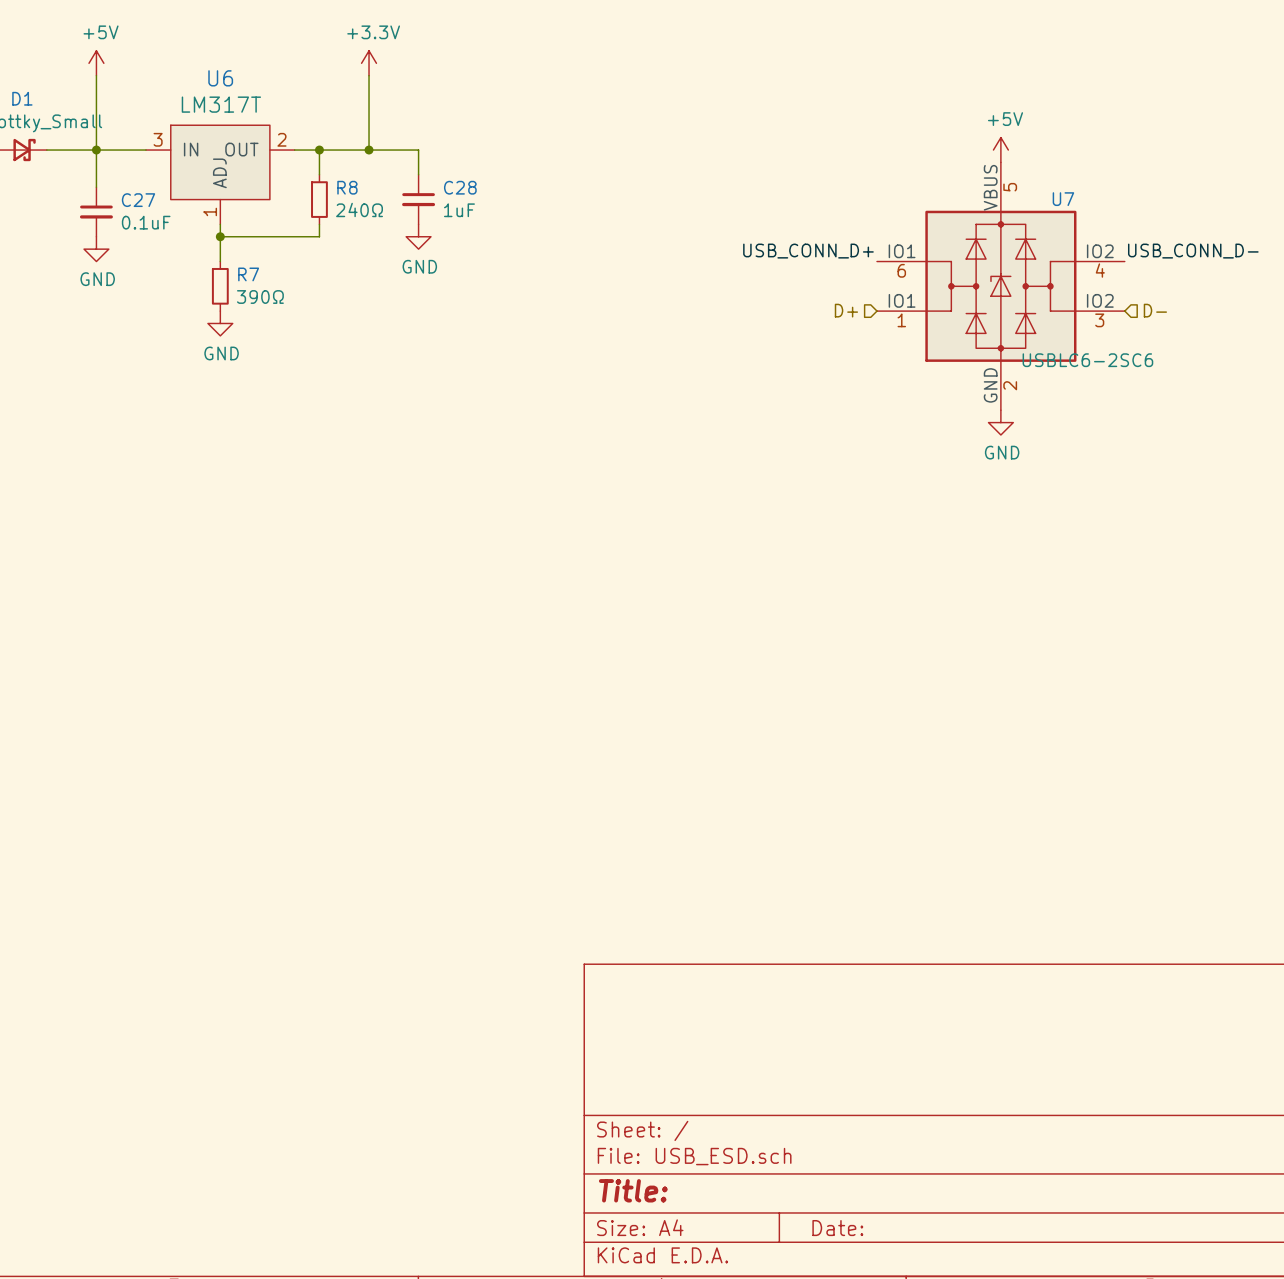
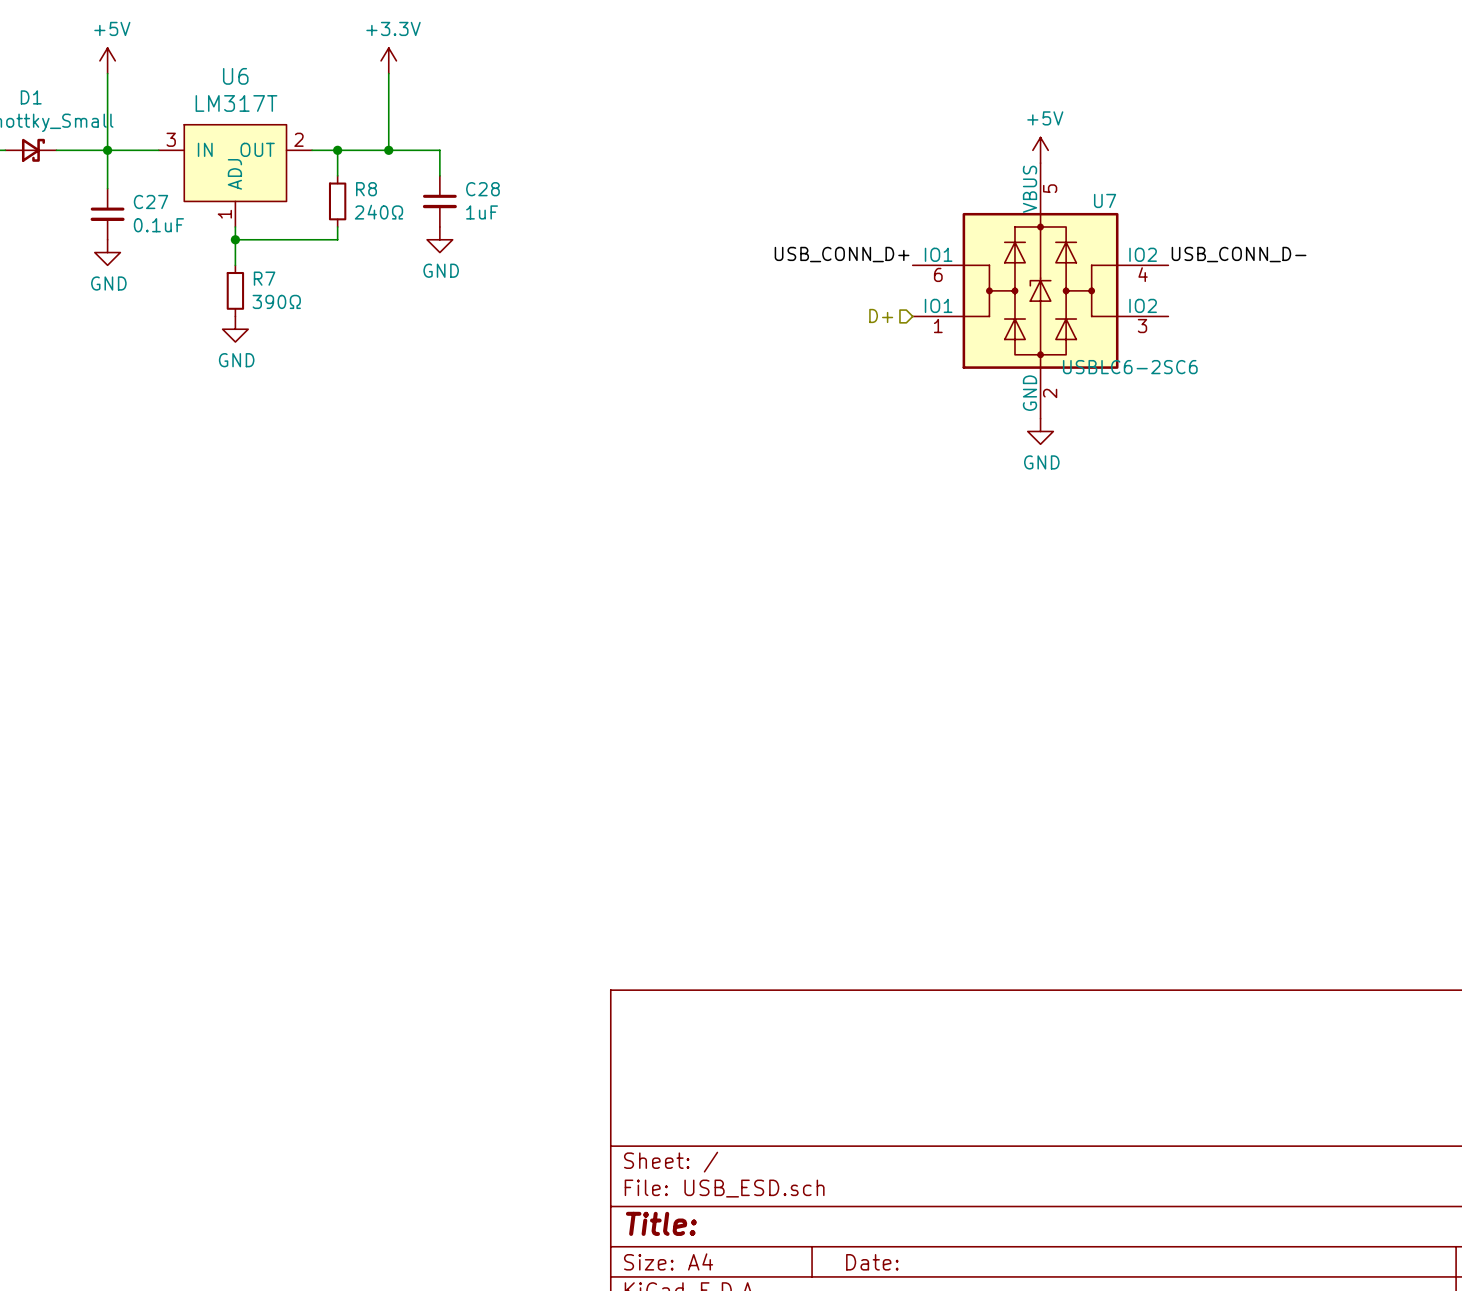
hierarchical label: D- (1155, 310) -> none

